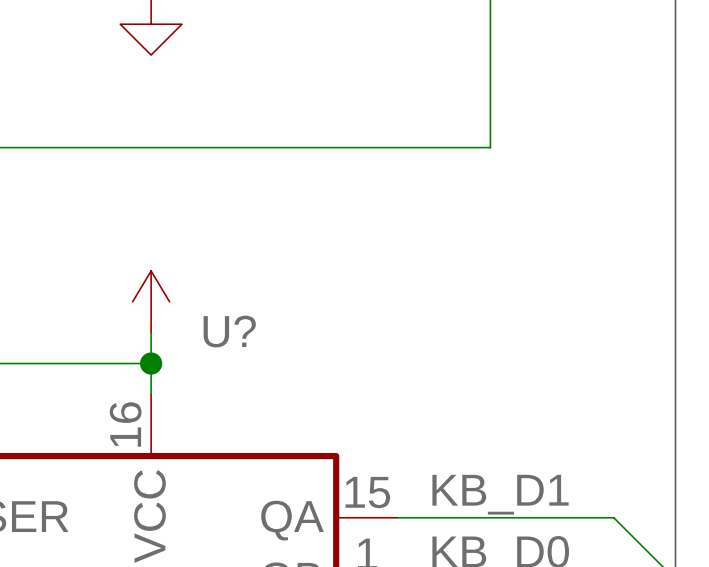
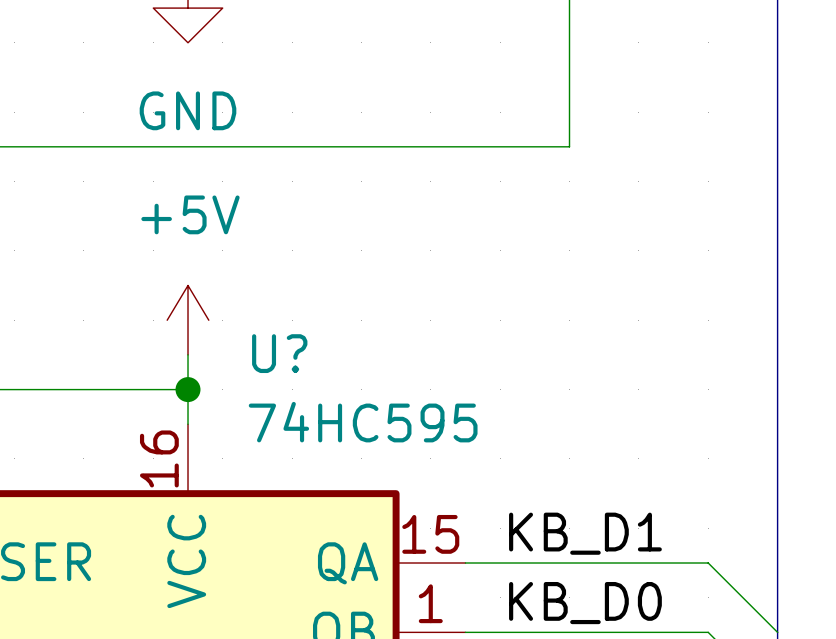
power symbol text: none -> GND (188, 110)
power symbol text: none -> +5V (190, 214)
U? value: none -> 74HC595 (363, 422)

